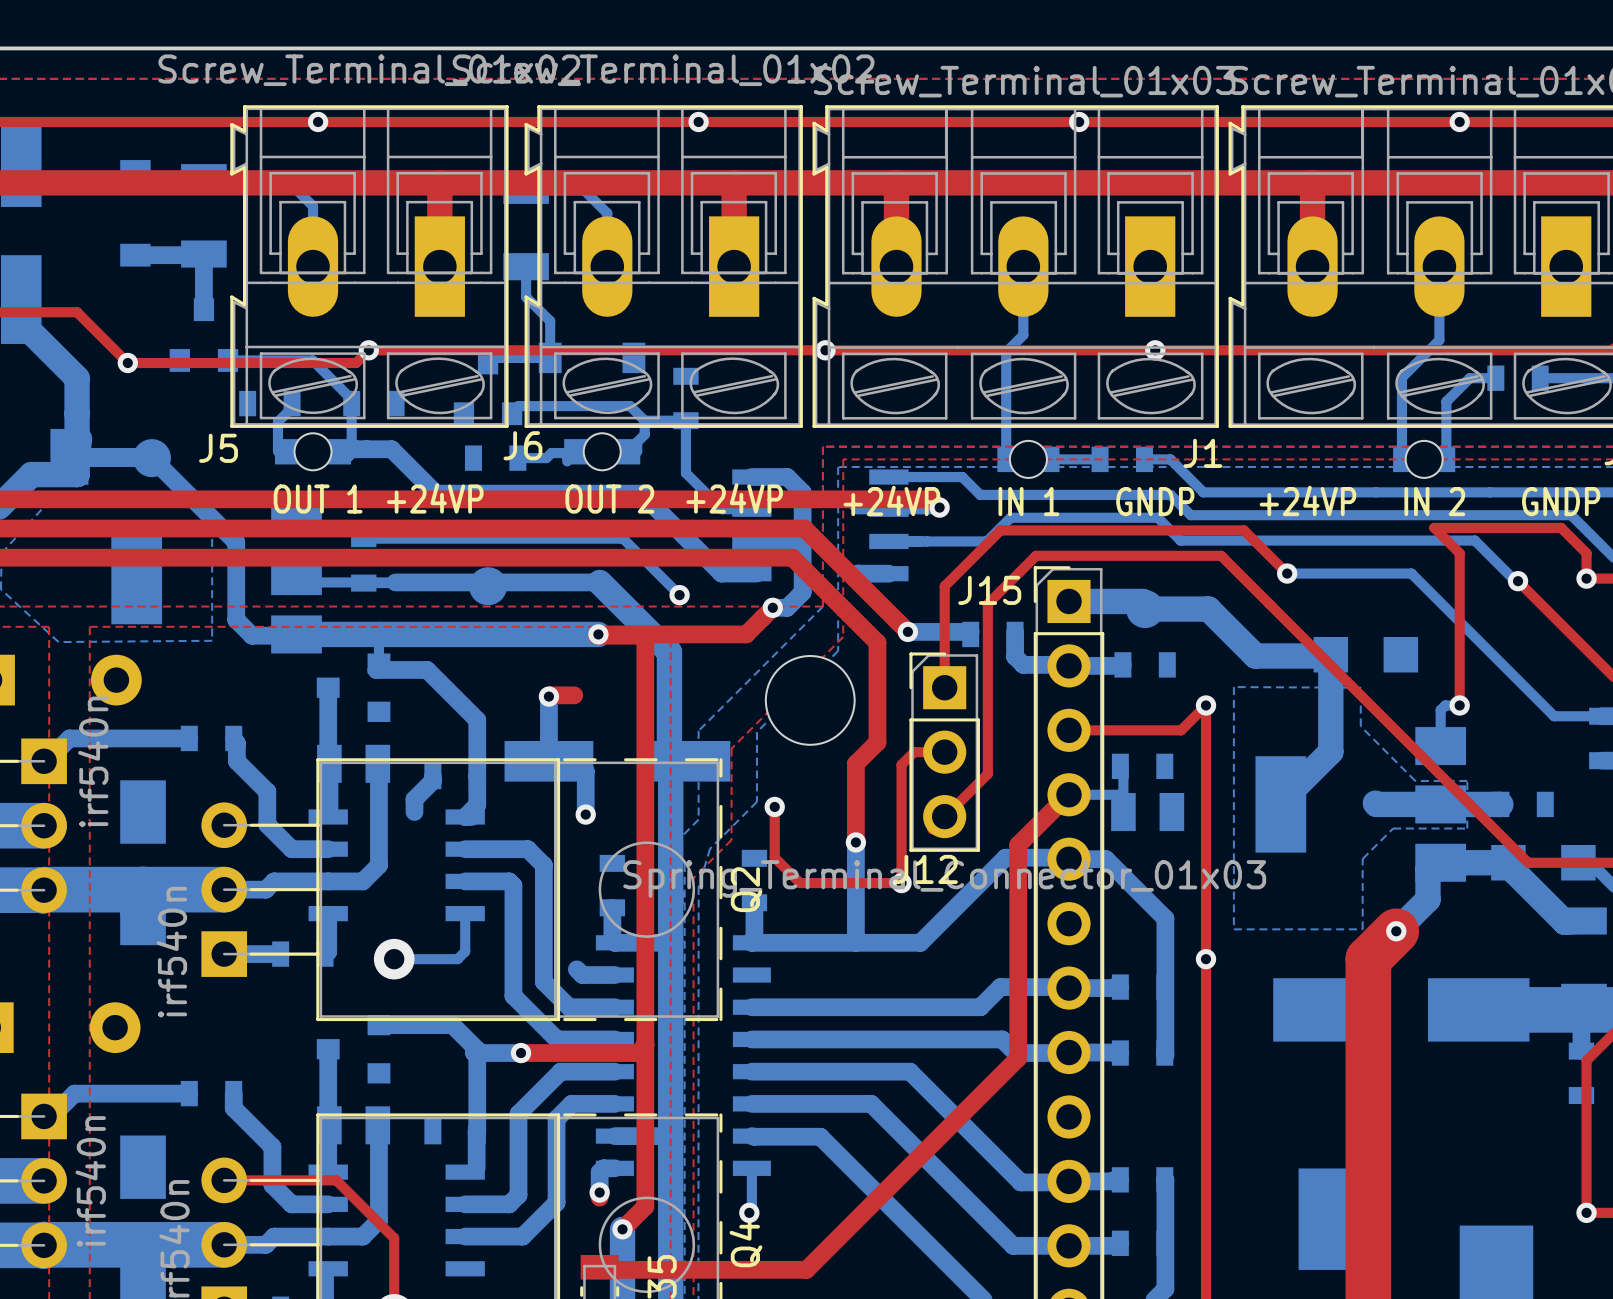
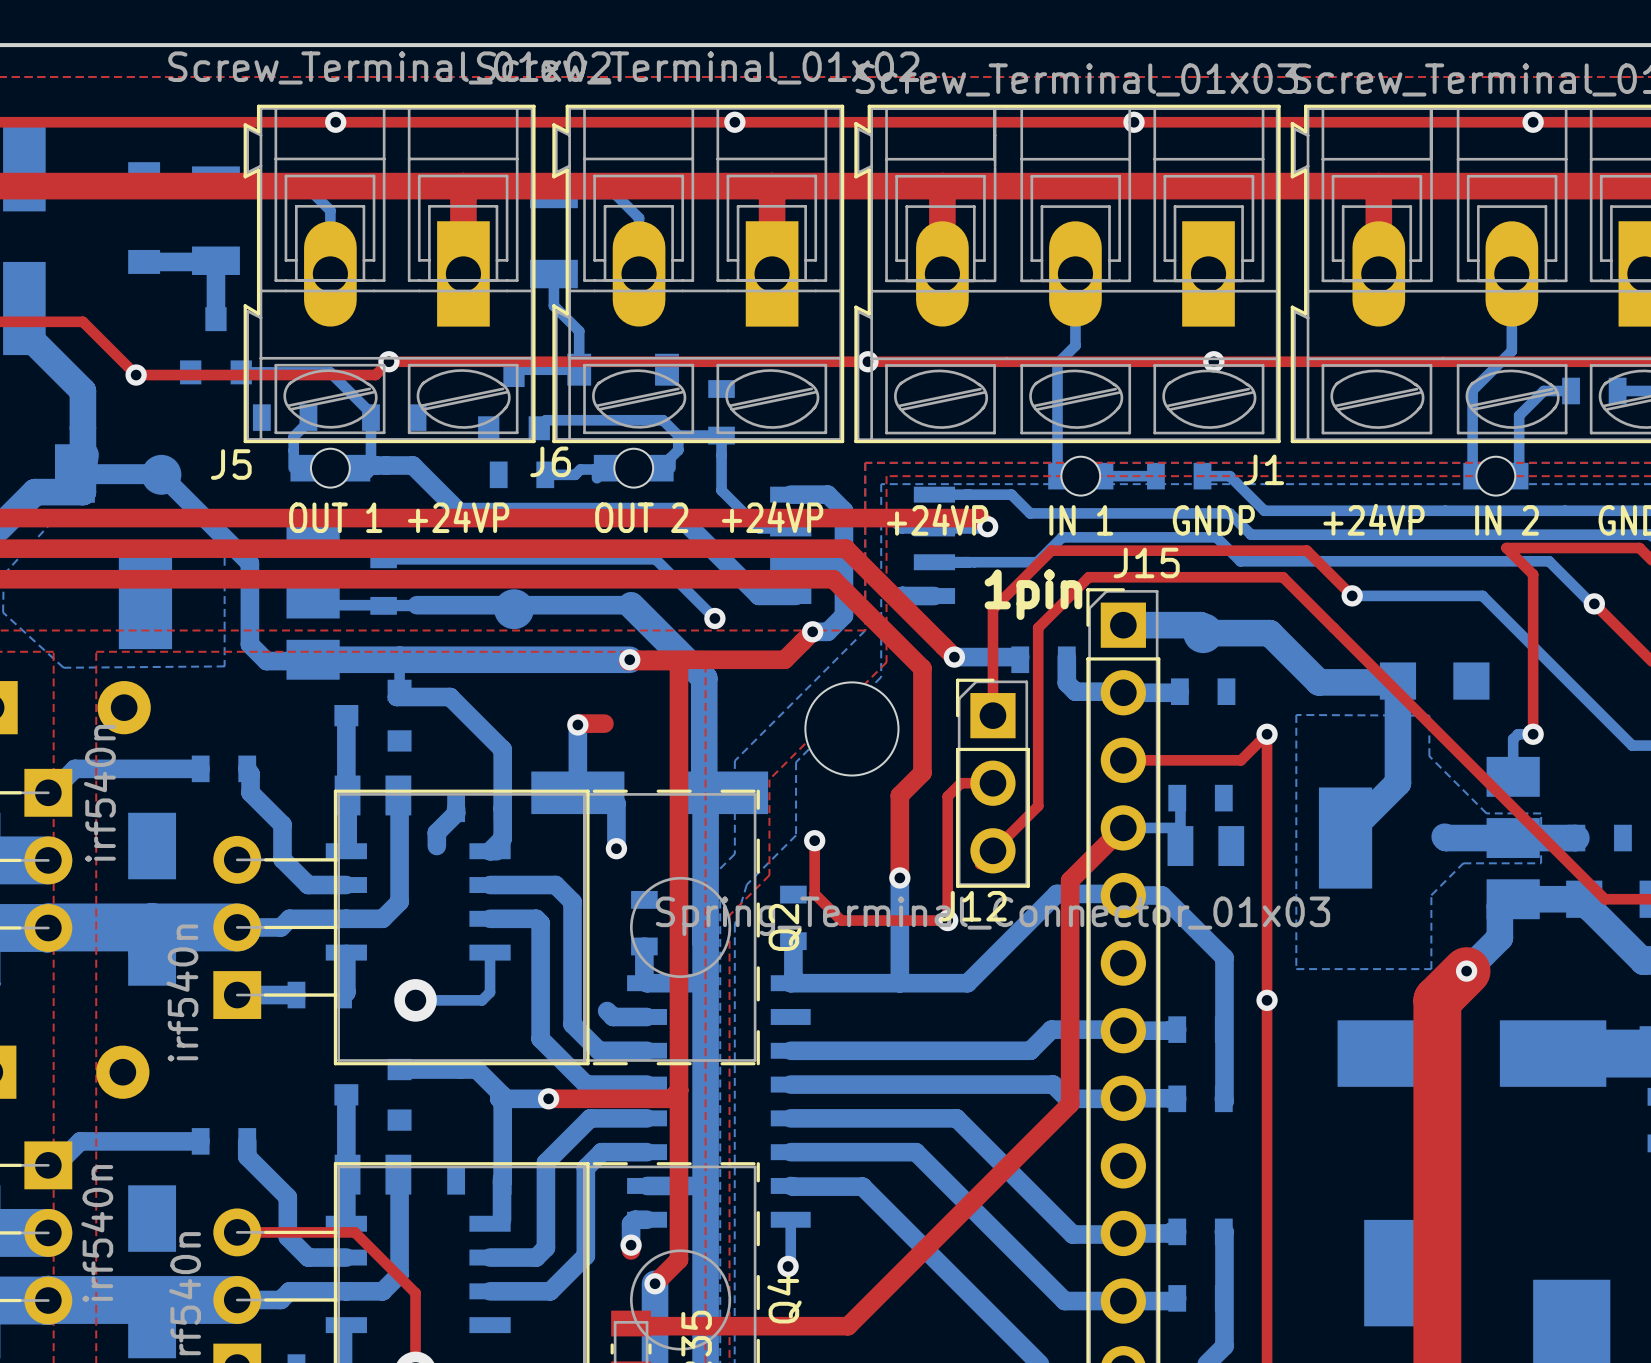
text: none -> 1pin (1033, 594)
J15 name position: J15 (989, 590) -> J15 (1146, 562)

